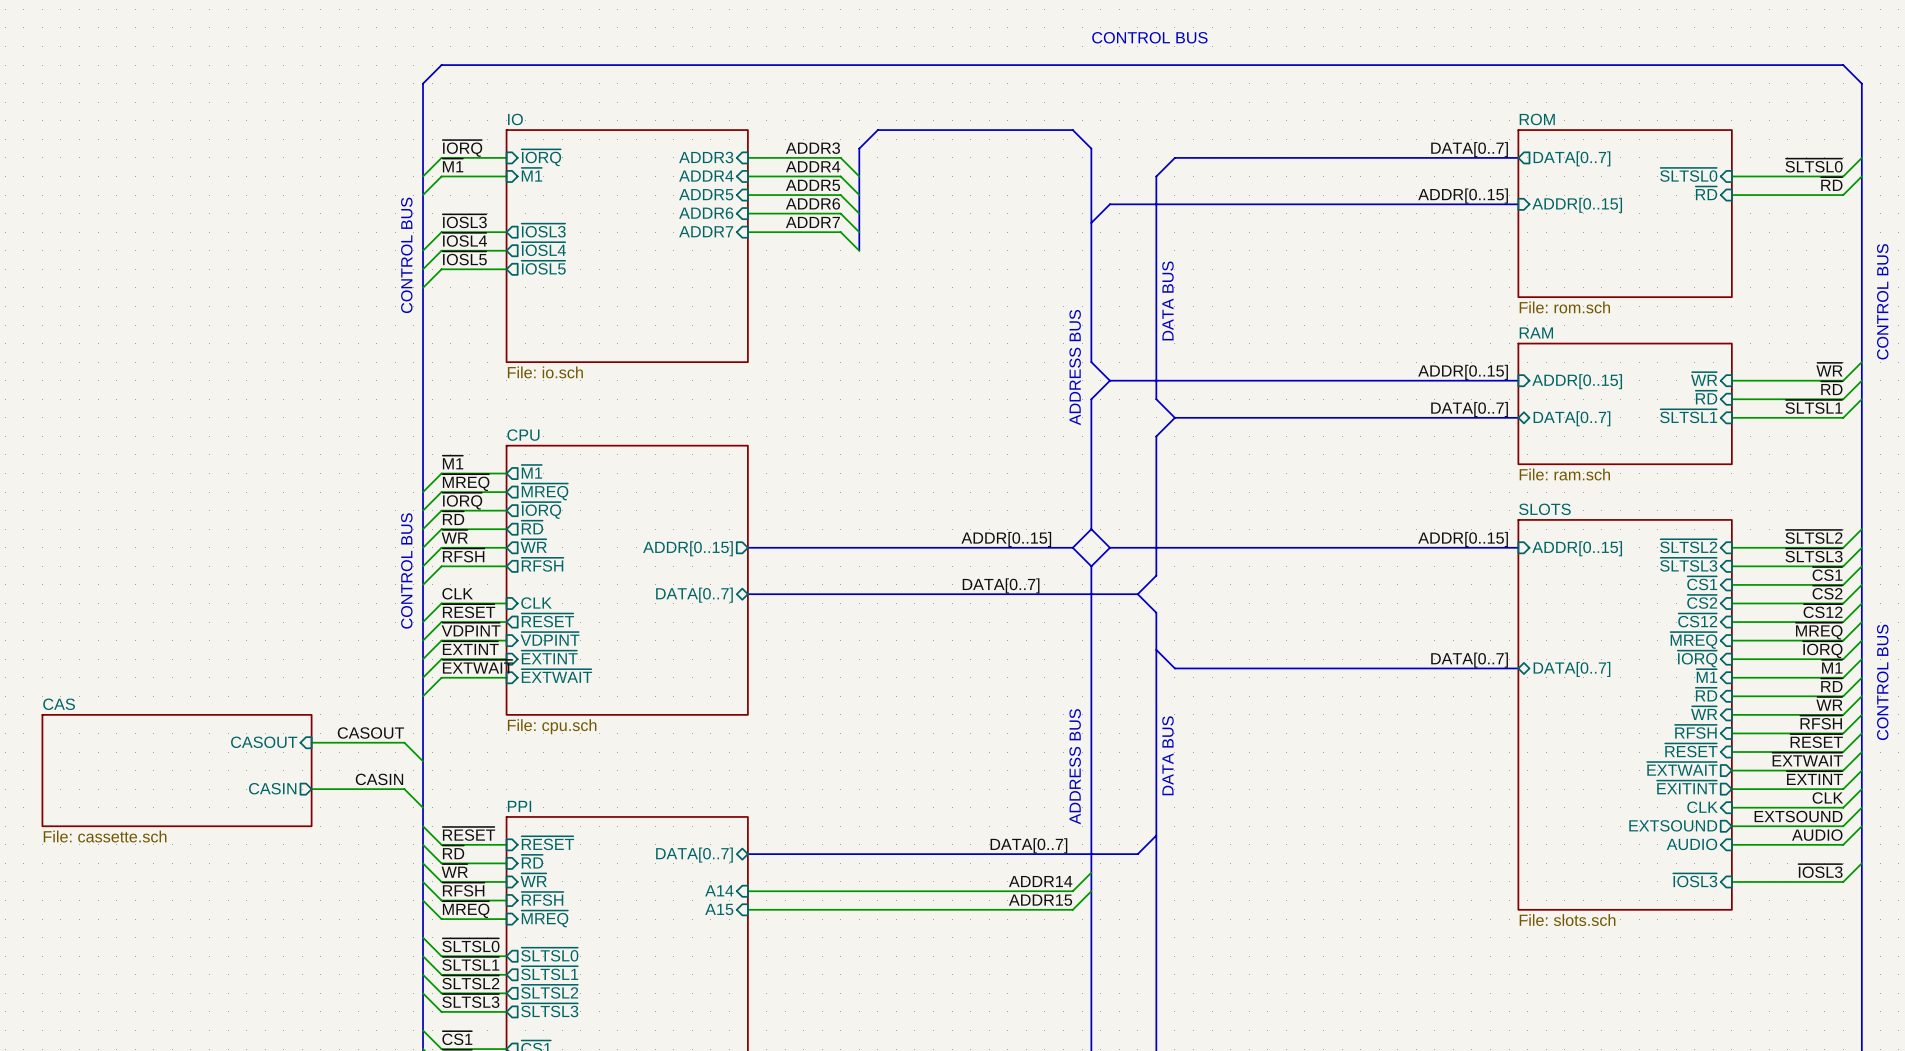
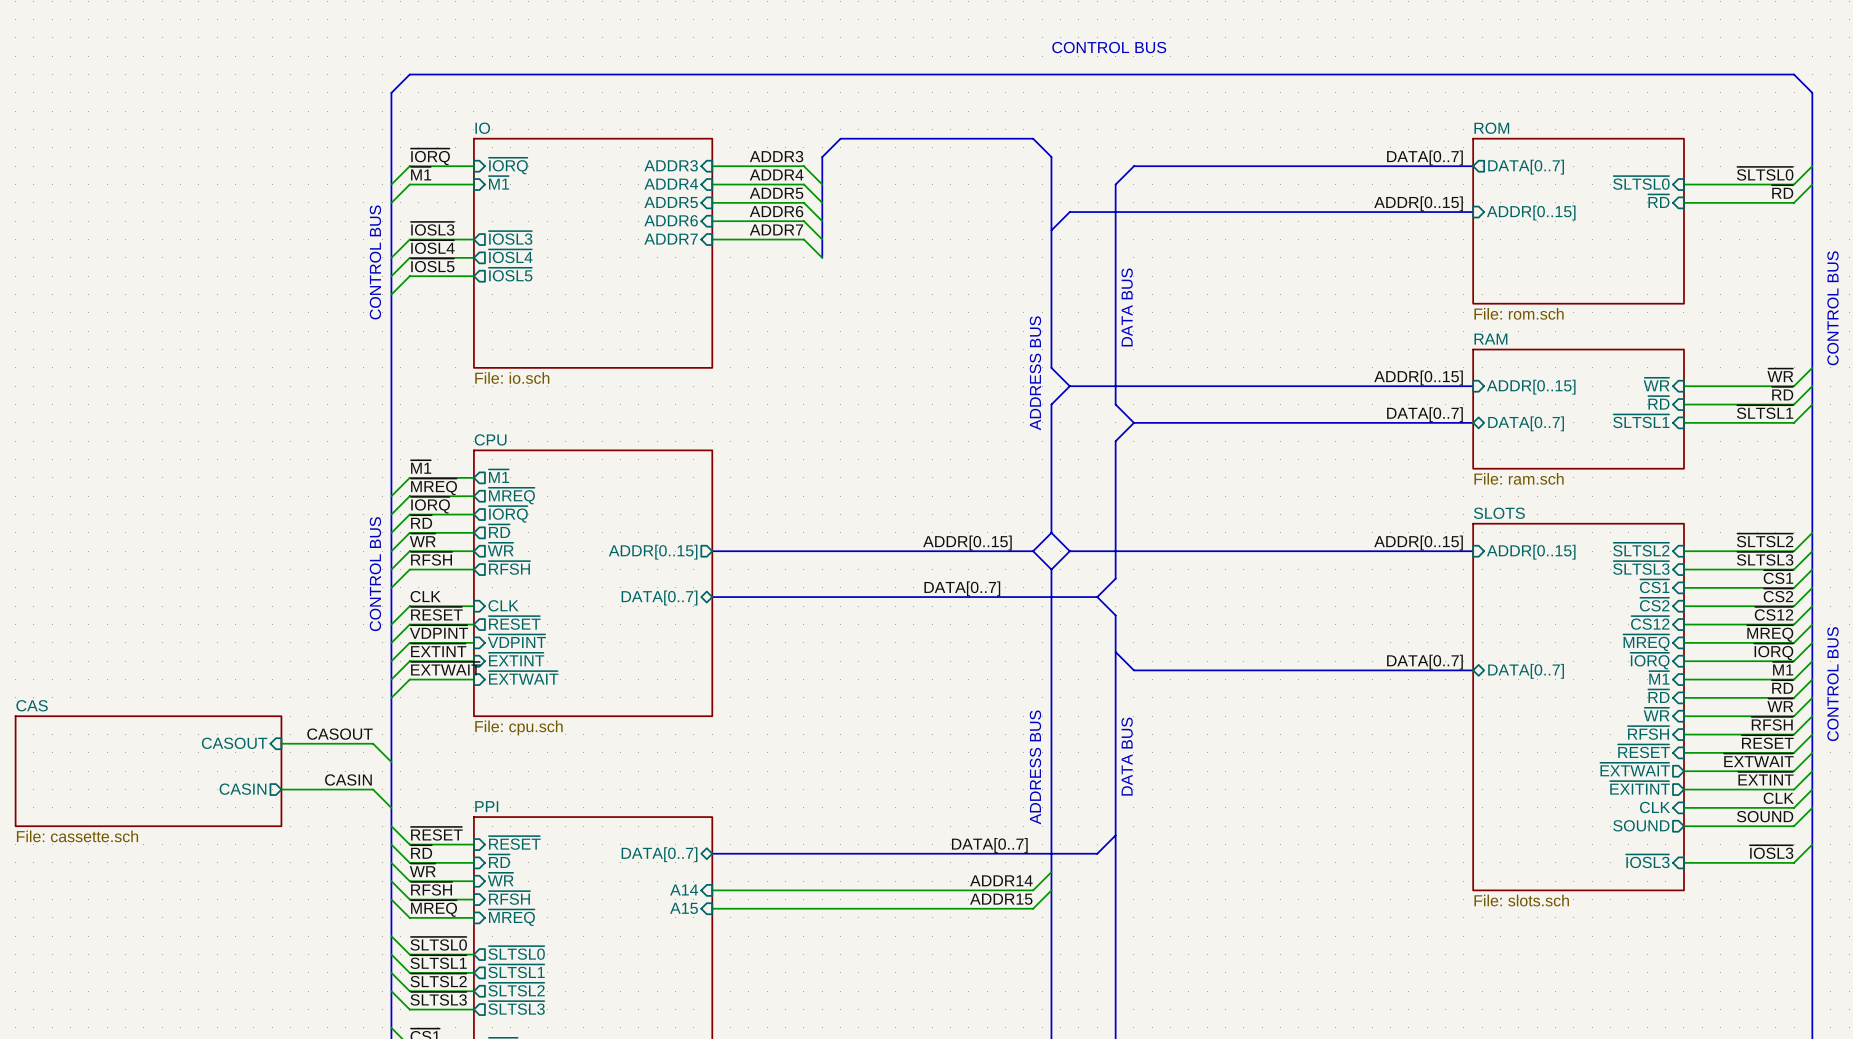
sheet SLOTS: none -> File: slots.sch (1578, 707)
sheet SLOTS: File: slots.sch (1625, 714) -> none
label: EXTSOUND (1798, 816) -> SOUND (1765, 816)
sheet pin: EXTSOUND (1673, 825) -> SOUND (1641, 825)
wire: (1861, 826) (1843, 844) (1731, 844) -> none
label: AUDIO (1817, 835) -> none
sheet pin: AUDIO (1691, 844) -> none
wire: (1861, 863) (1843, 881) (1731, 881) -> (1812, 844) (1794, 862) (1683, 862)
label position: ~{IOSL3} (1820, 871) -> ~{IOSL3} (1771, 852)
sheet pin position: ~{IOSL3} (1695, 880) -> ~{IOSL3} (1647, 861)

